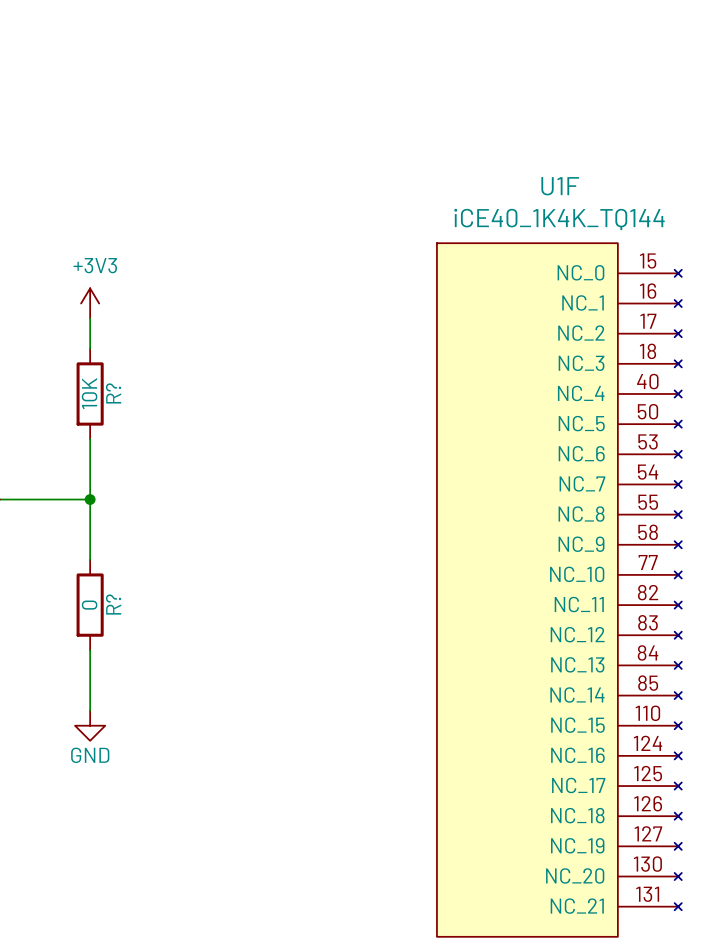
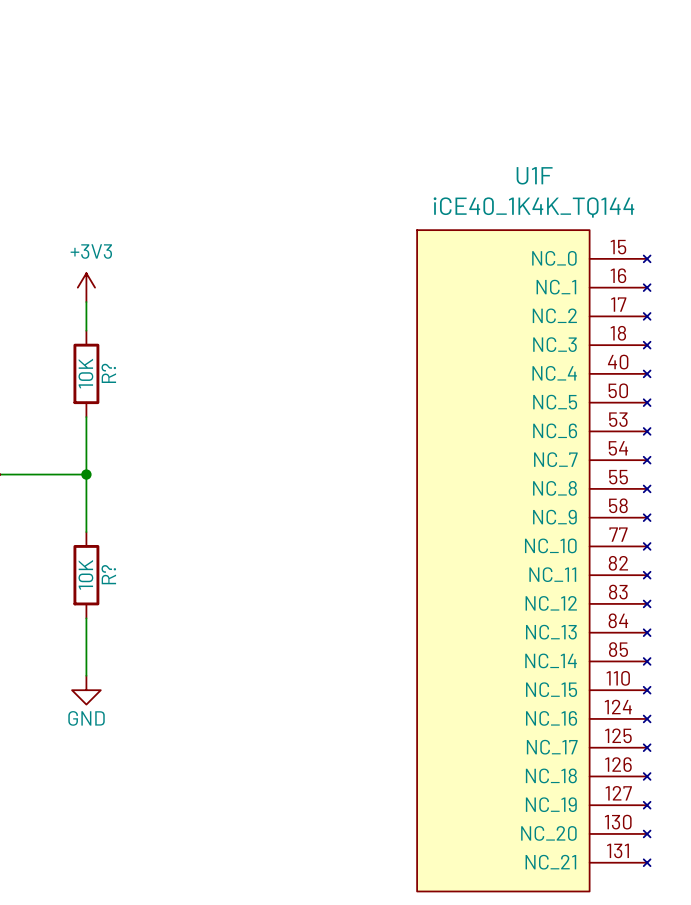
R? value: 0 (89, 605) -> 10K (85, 574)

